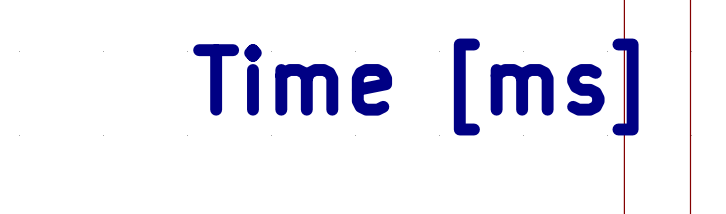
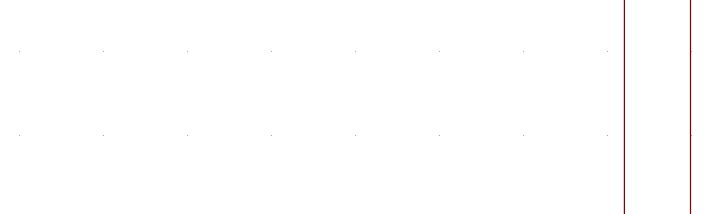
text: Time [ms] (415, 87) -> none

